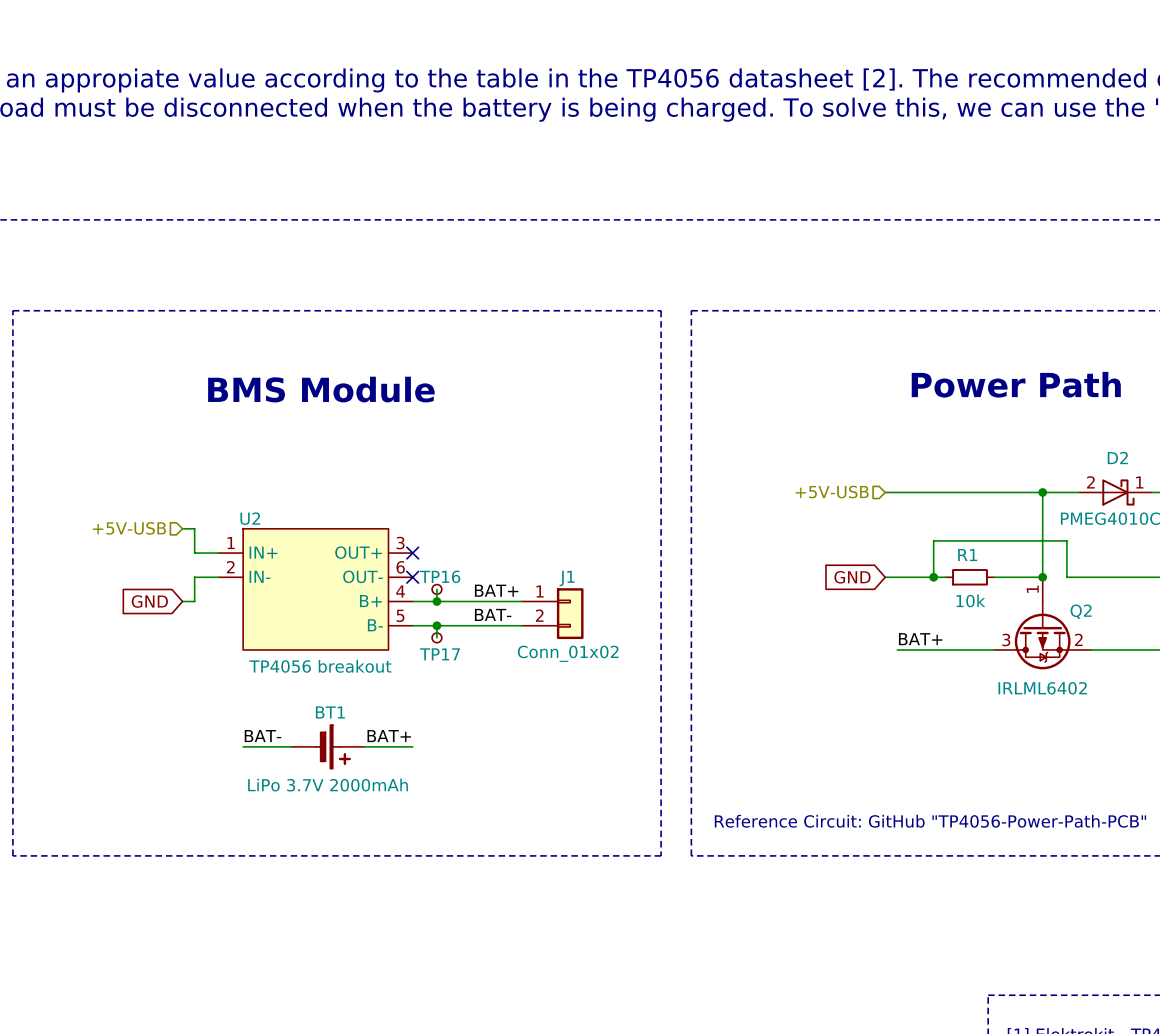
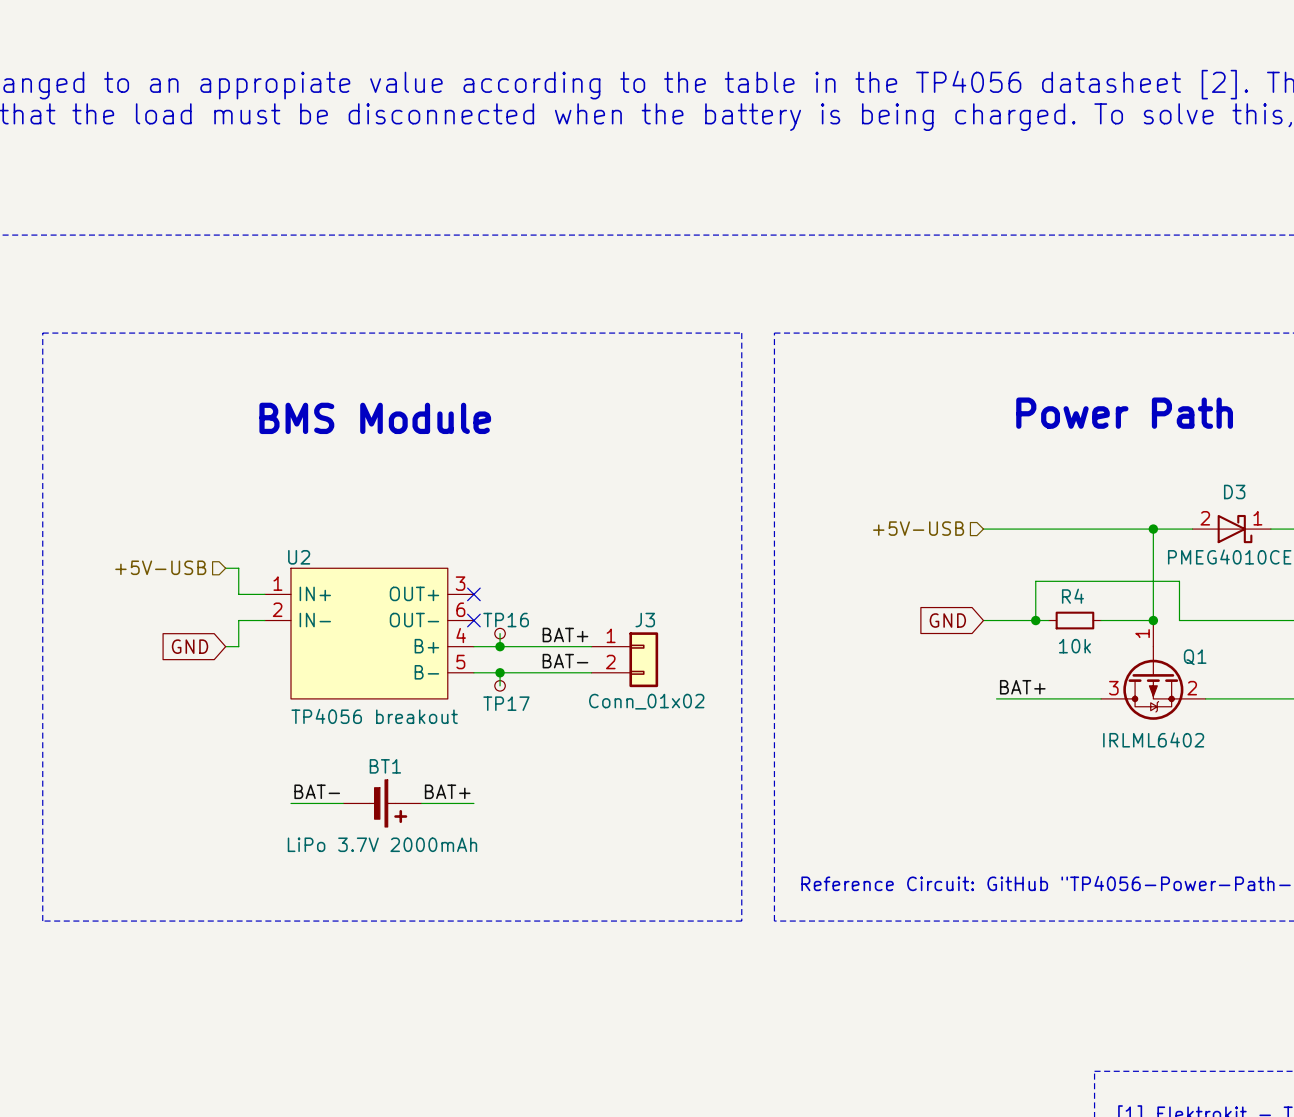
D2 name: D2 (1117, 457) -> D3 (1234, 491)
R1 name: R1 (967, 555) -> R4 (1072, 596)
J1 name: J1 (567, 578) -> J3 (645, 620)
Q2 name: Q2 (1081, 611) -> Q1 (1195, 657)

